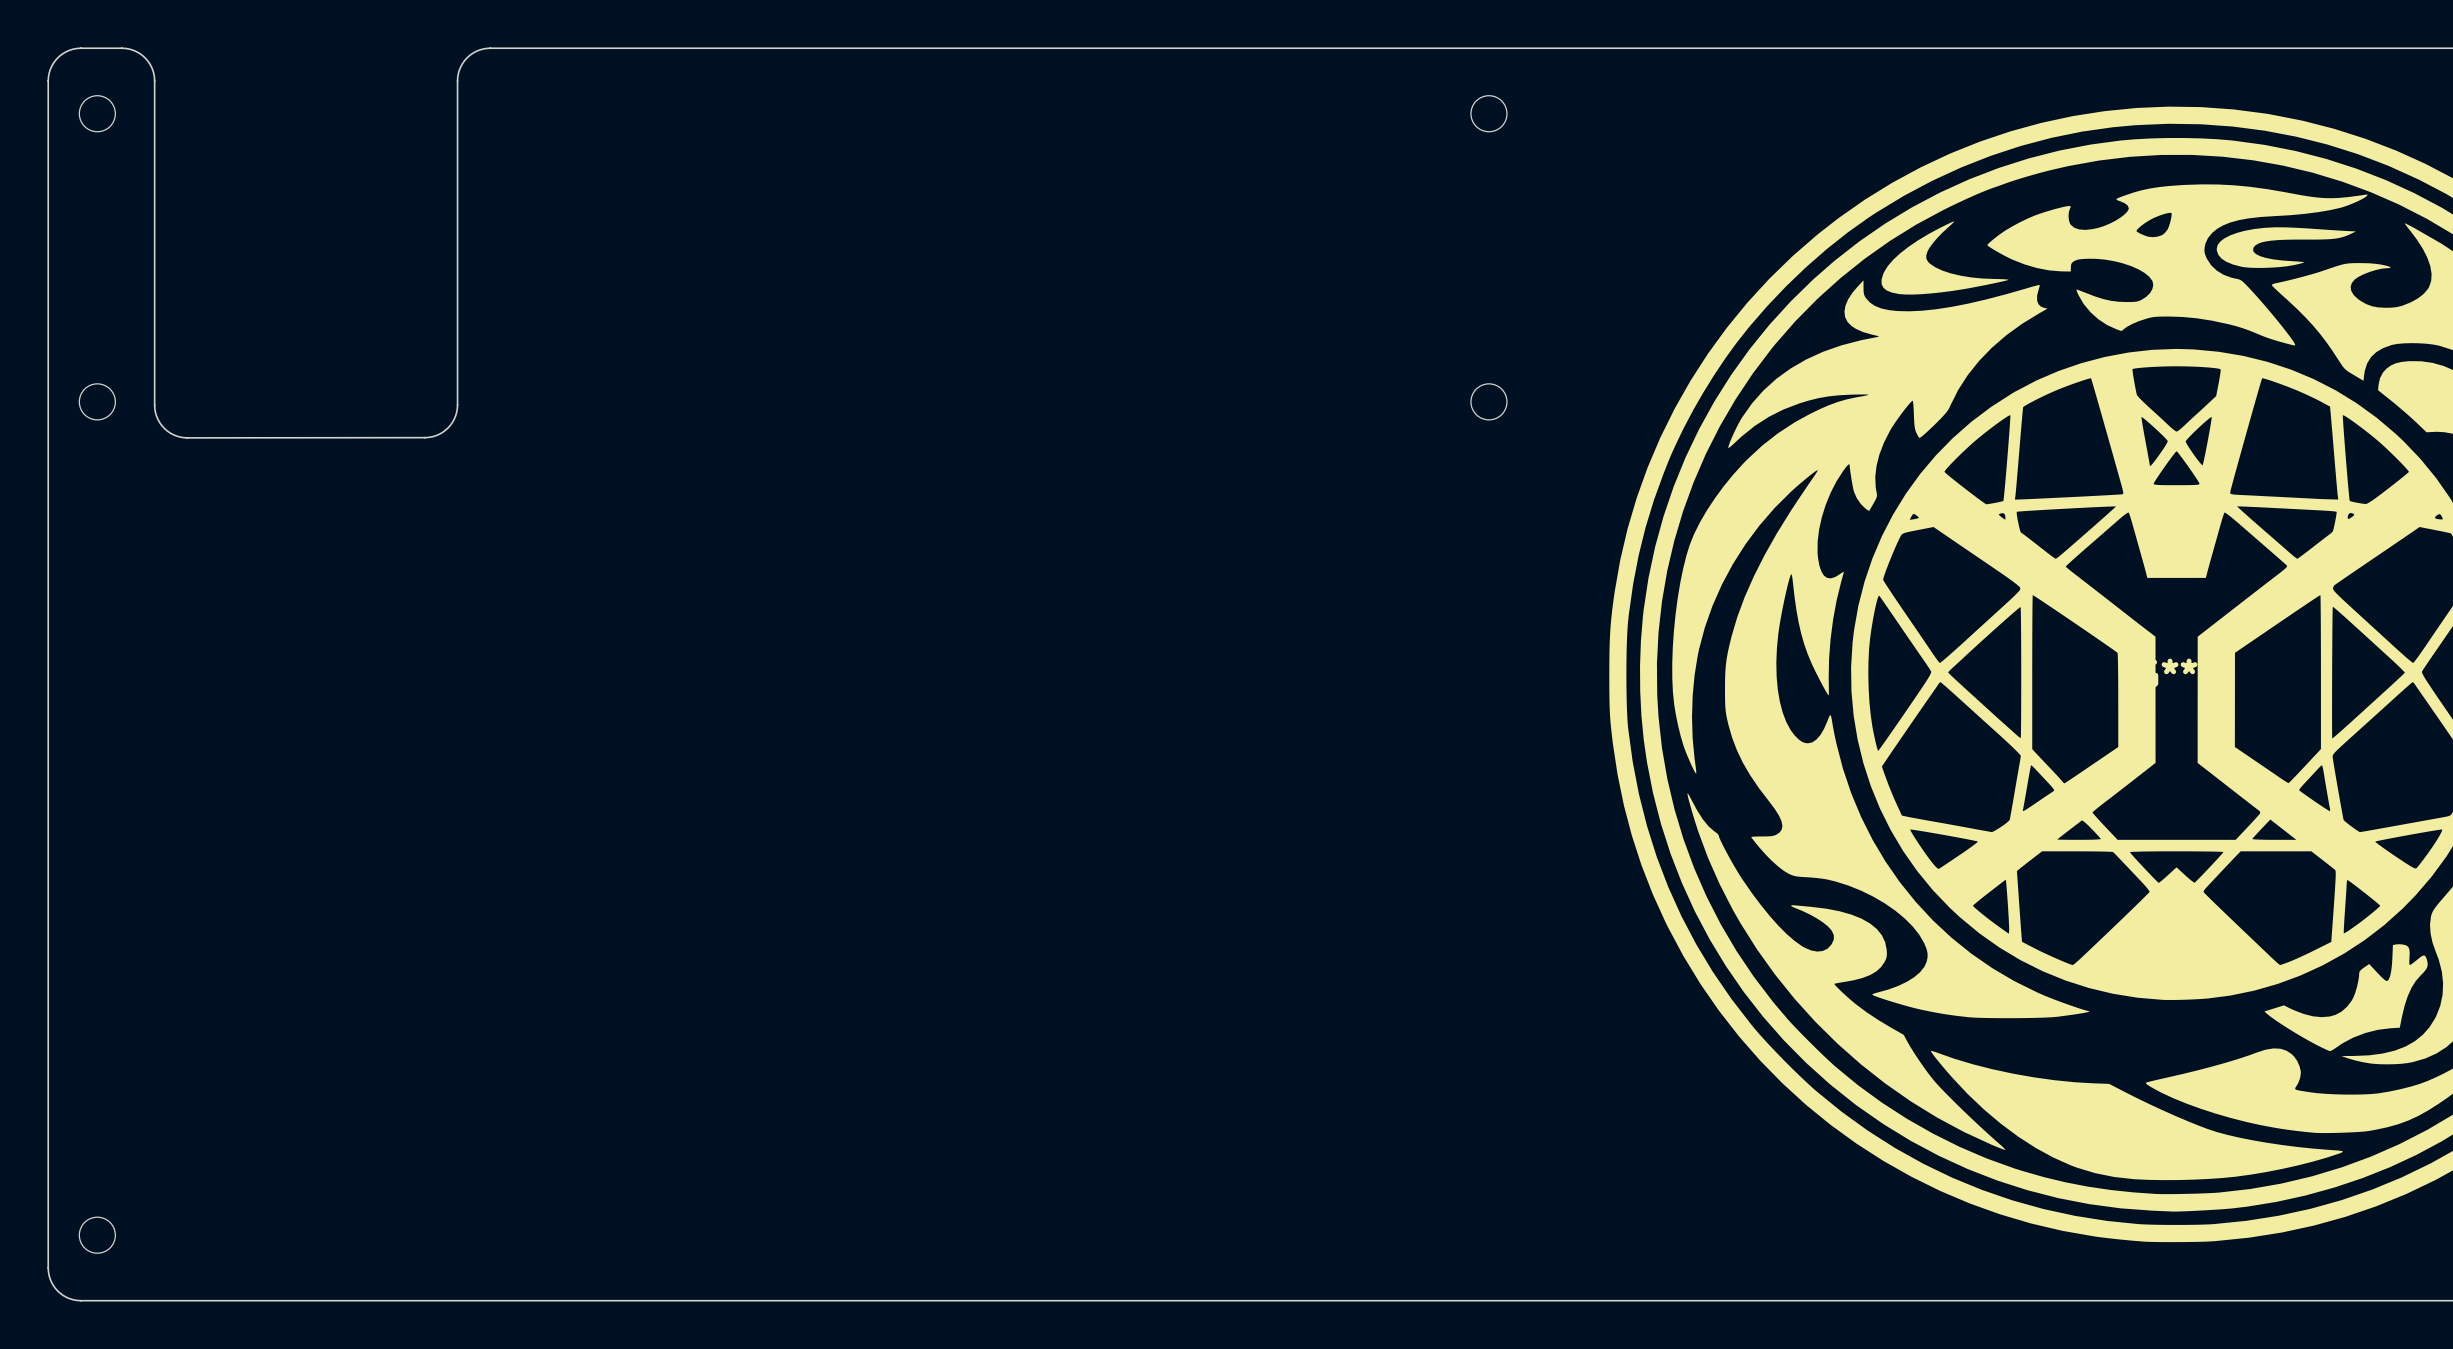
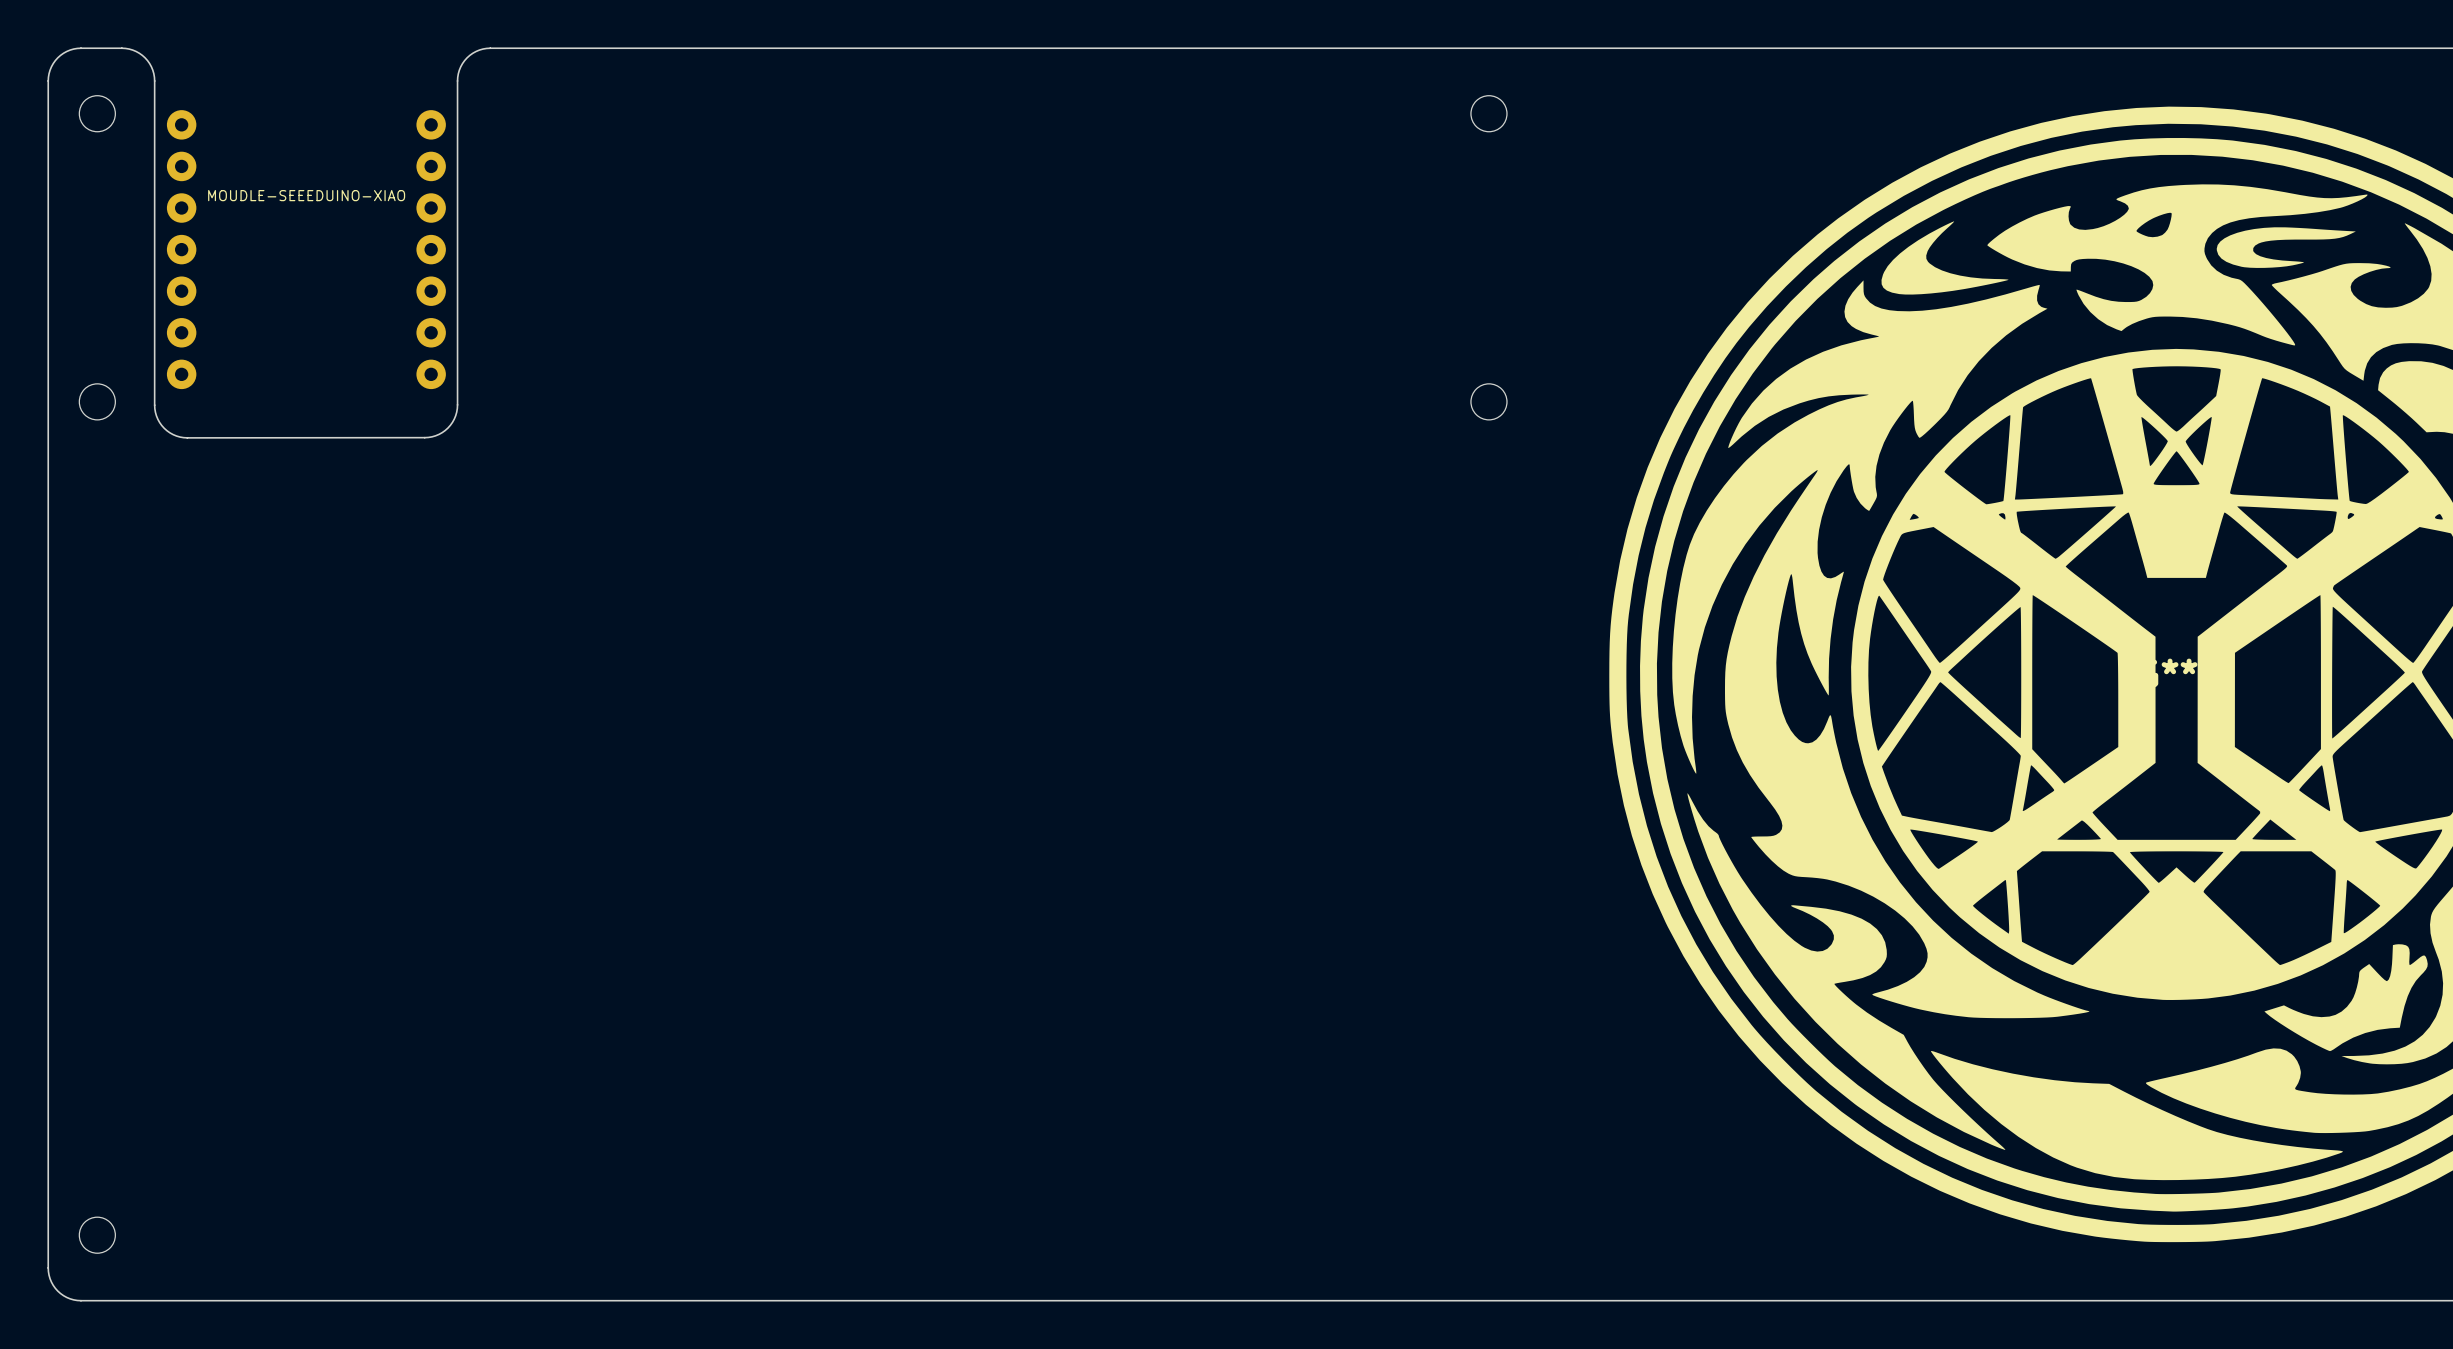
part: none -> MOUDLE-SEEEDUINO-XIAO (306, 249)

